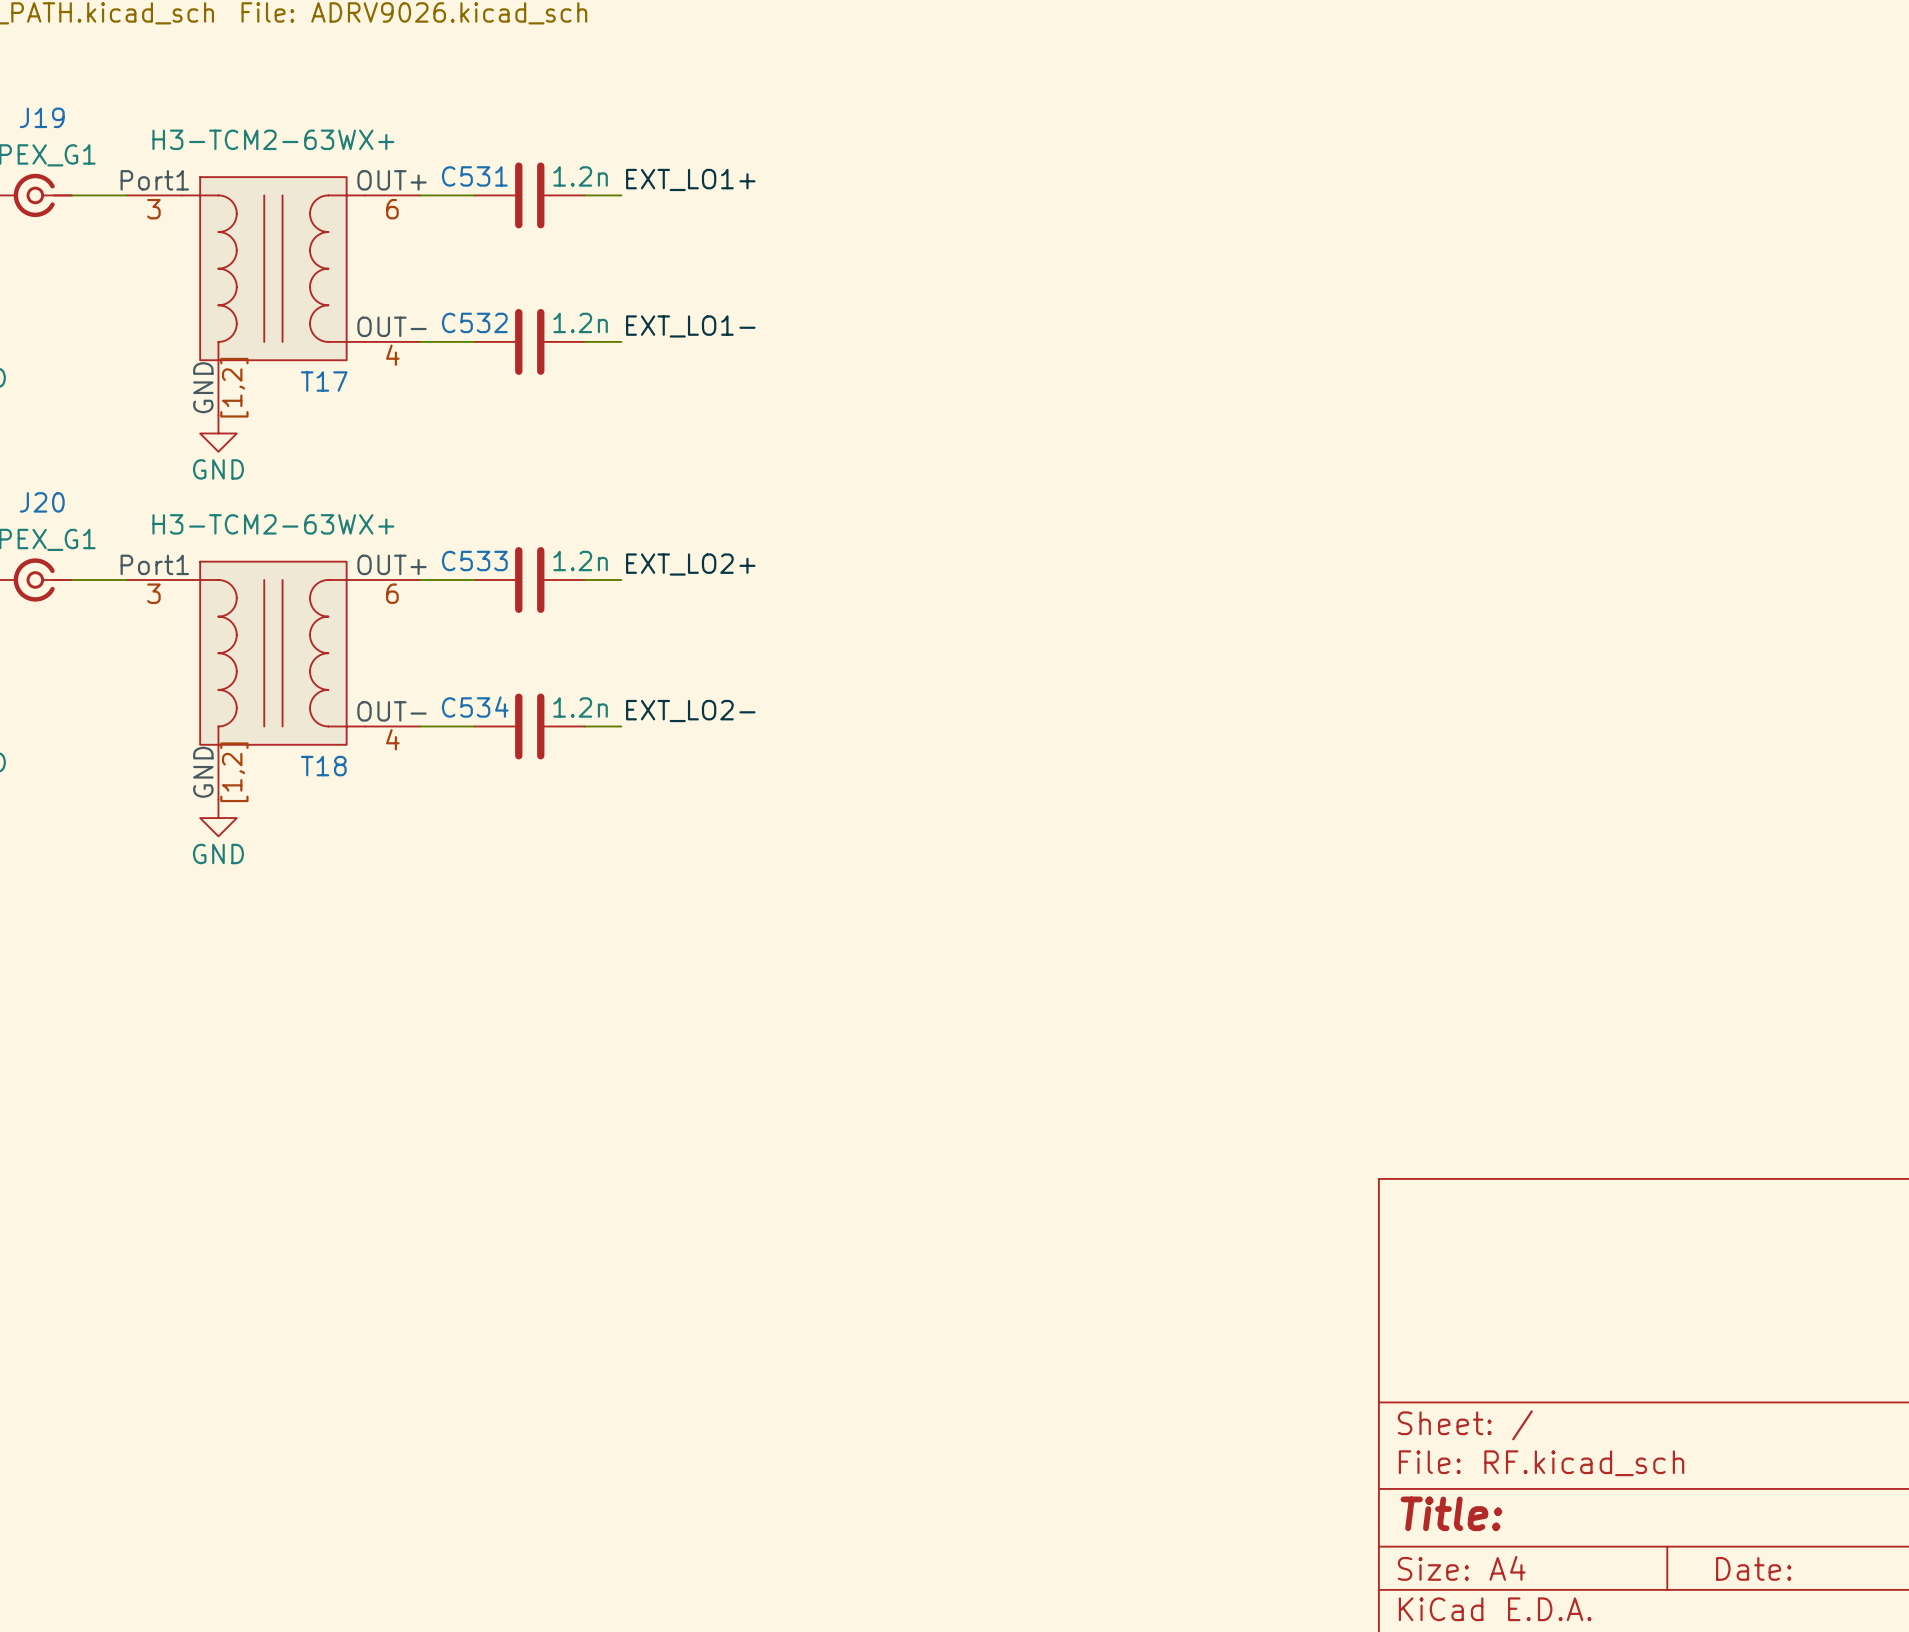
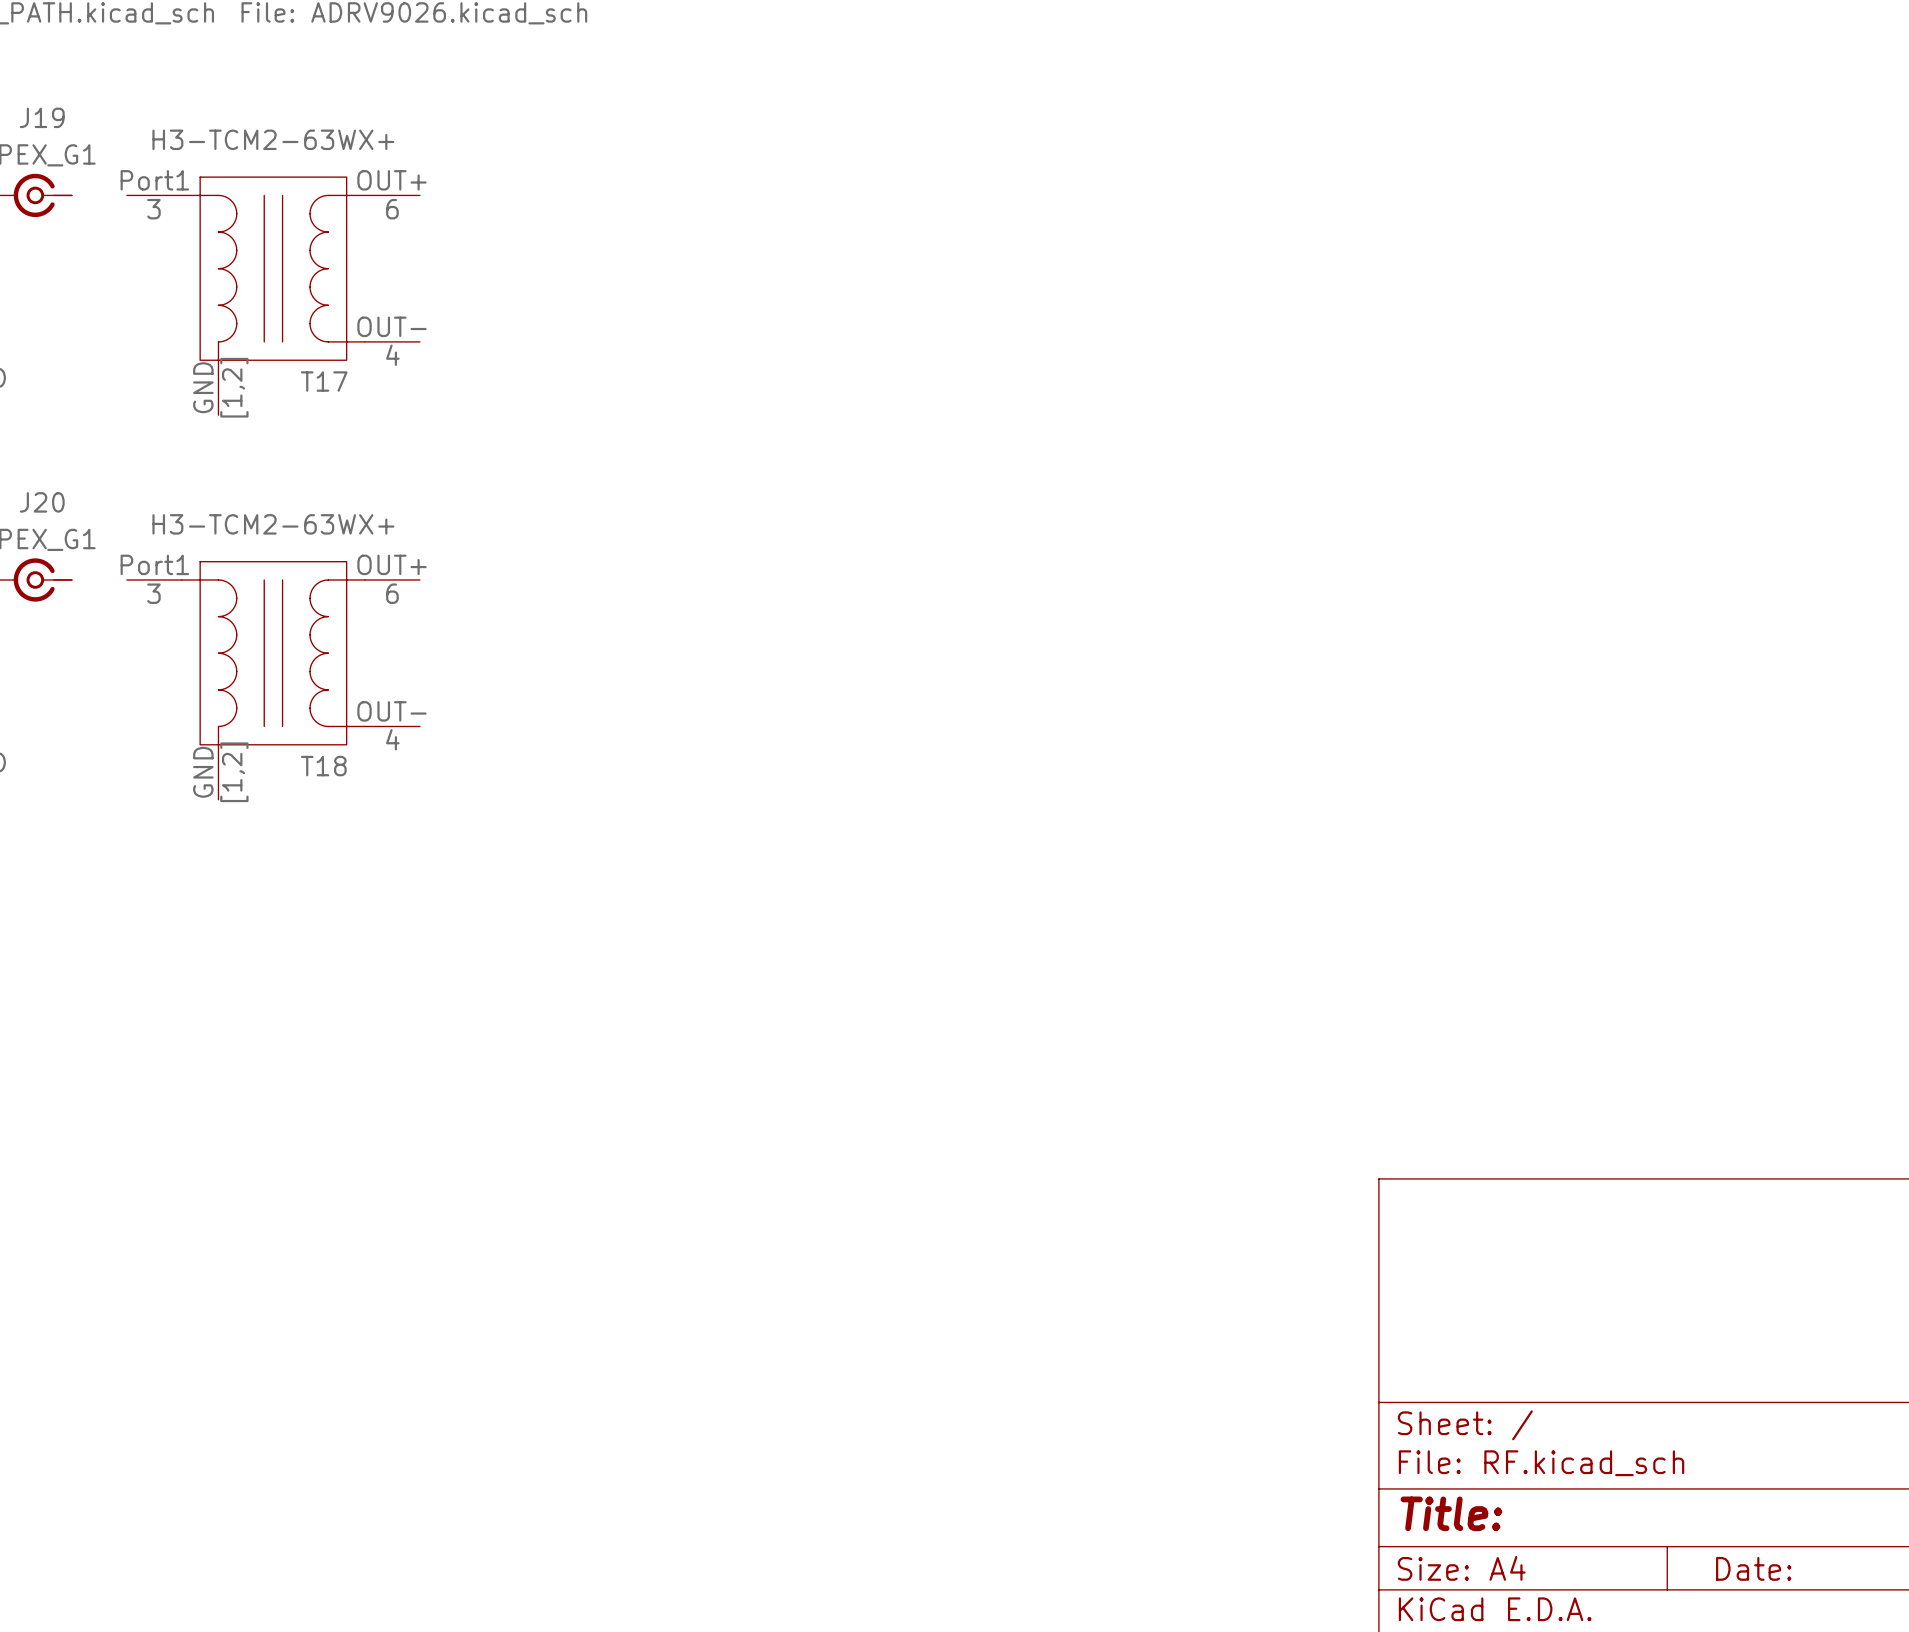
label: EXT_LO1+ (690, 179) -> none
wire: (71, 195) (126, 195) -> none
wire: (419, 195) (474, 195) -> none
C531: 1.2n (529, 195) -> none
wire: (584, 195) (621, 195) -> none
label: EXT_LO1- (690, 326) -> none
wire: (419, 341) (474, 341) -> none
C532: 1.2n (529, 341) -> none
wire: (584, 341) (621, 341) -> none
power symbol: GND (218, 433) -> none
label: EXT_LO2+ (690, 564) -> none
wire: (71, 579) (126, 579) -> none
wire: (419, 579) (474, 579) -> none
C533: 1.2n (529, 579) -> none
wire: (584, 579) (621, 579) -> none
label: EXT_LO2- (690, 711) -> none
wire: (419, 726) (474, 726) -> none
C534: 1.2n (529, 726) -> none
wire: (584, 726) (621, 726) -> none
power symbol: GND (218, 818) -> none

